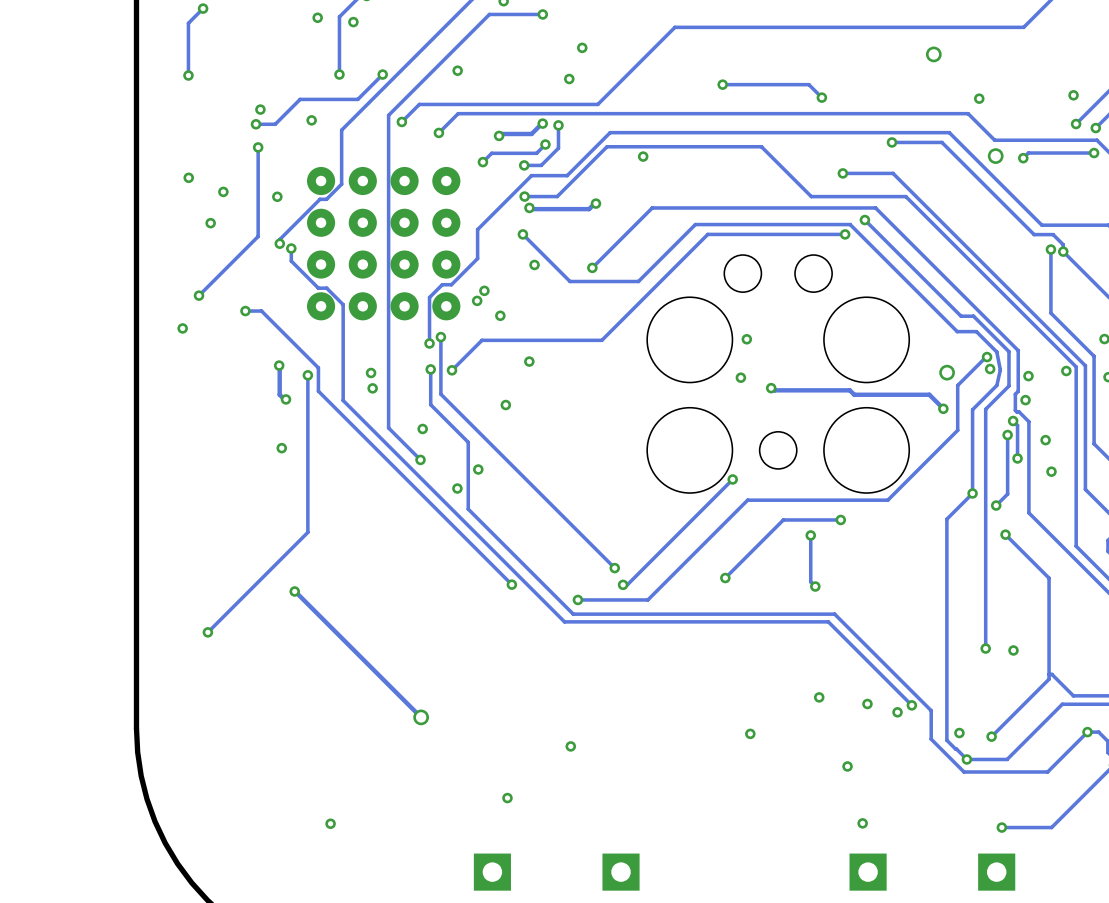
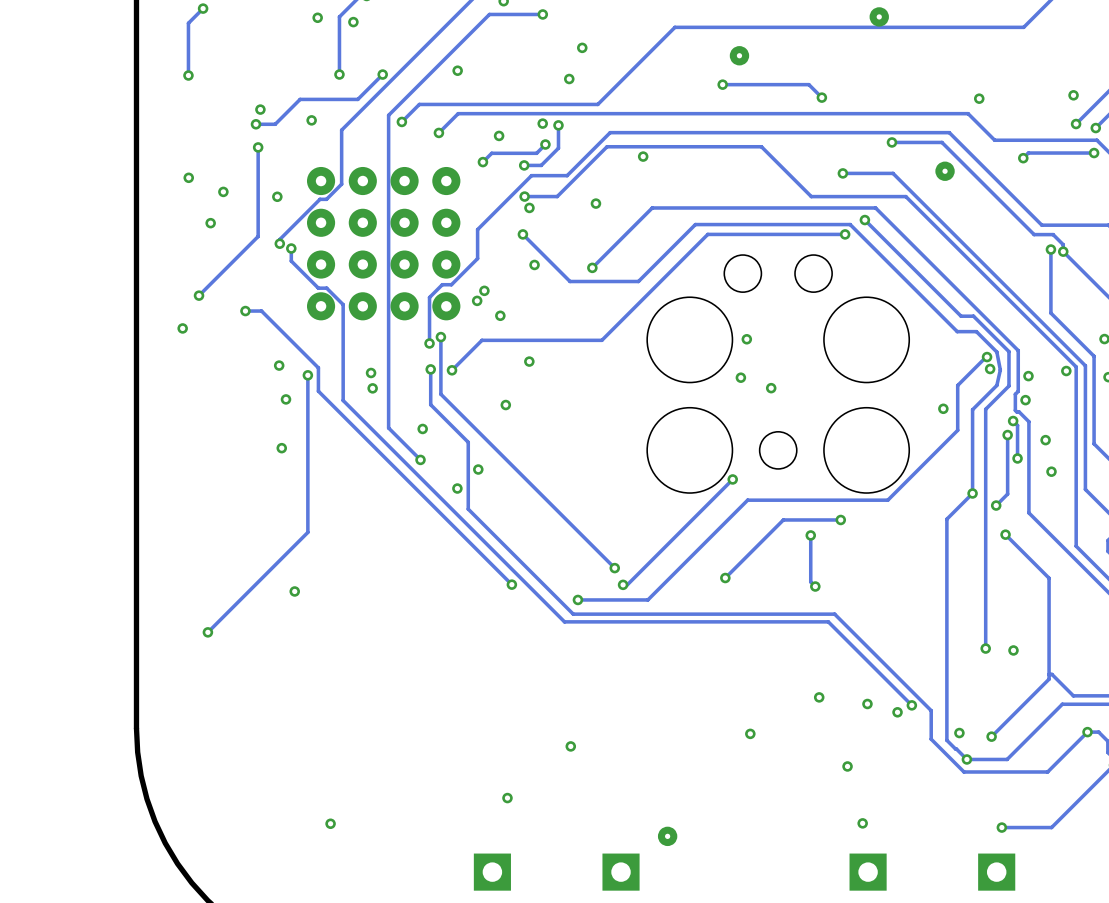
via: none -> (879, 16)
via: (933, 54) -> none
via: none -> (739, 55)
track: (542, 123) (531, 133) (500, 133) (499, 135) -> none
via: (995, 156) -> none
via: none -> (945, 171)
track: (595, 203) (589, 209) (529, 207) -> none
track: (279, 365) (279, 394) (286, 399) -> none
via: (947, 372) -> none
track: (771, 388) (774, 390) (849, 390) (854, 394) (929, 394) (943, 408) -> none
track: (294, 591) (421, 717) -> none
via: (421, 717) -> none
via: none -> (667, 836)

